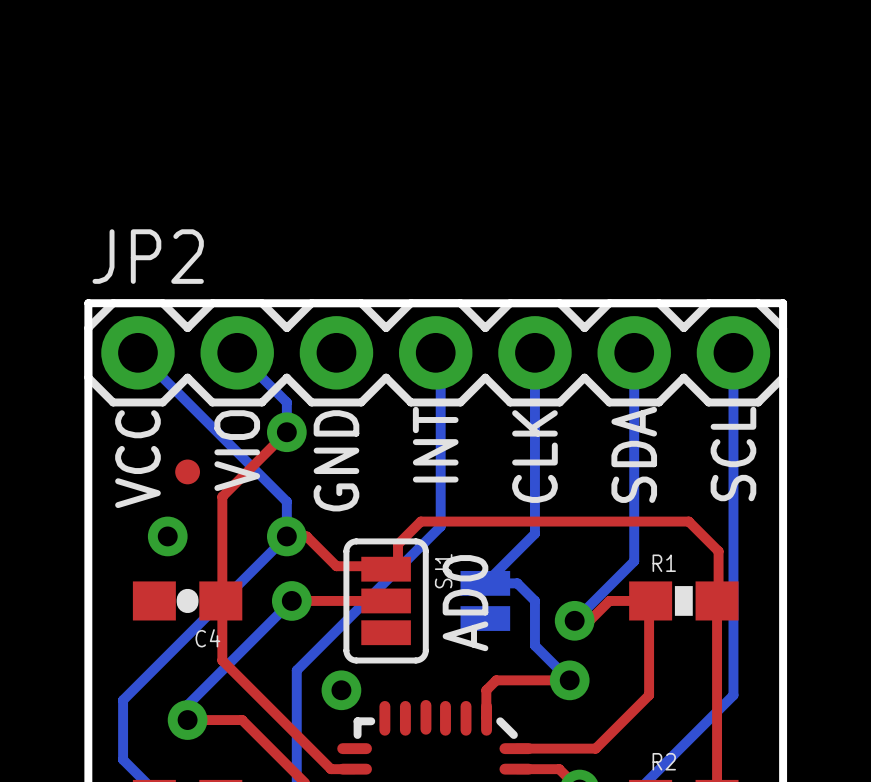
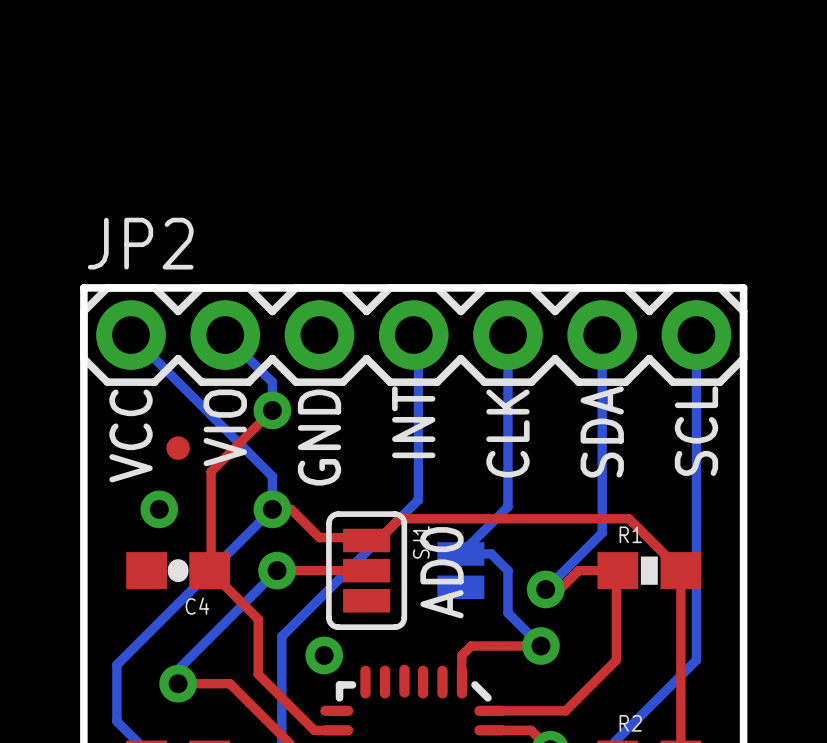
top track: (398, 569) (398, 544) (420, 521) (688, 521) (718, 551) (717, 600) -> (377, 540) (399, 518) (629, 518) (680, 570)
top track: (222, 602) (222, 660) (271, 710) -> (211, 572) (258, 619) (258, 674)

